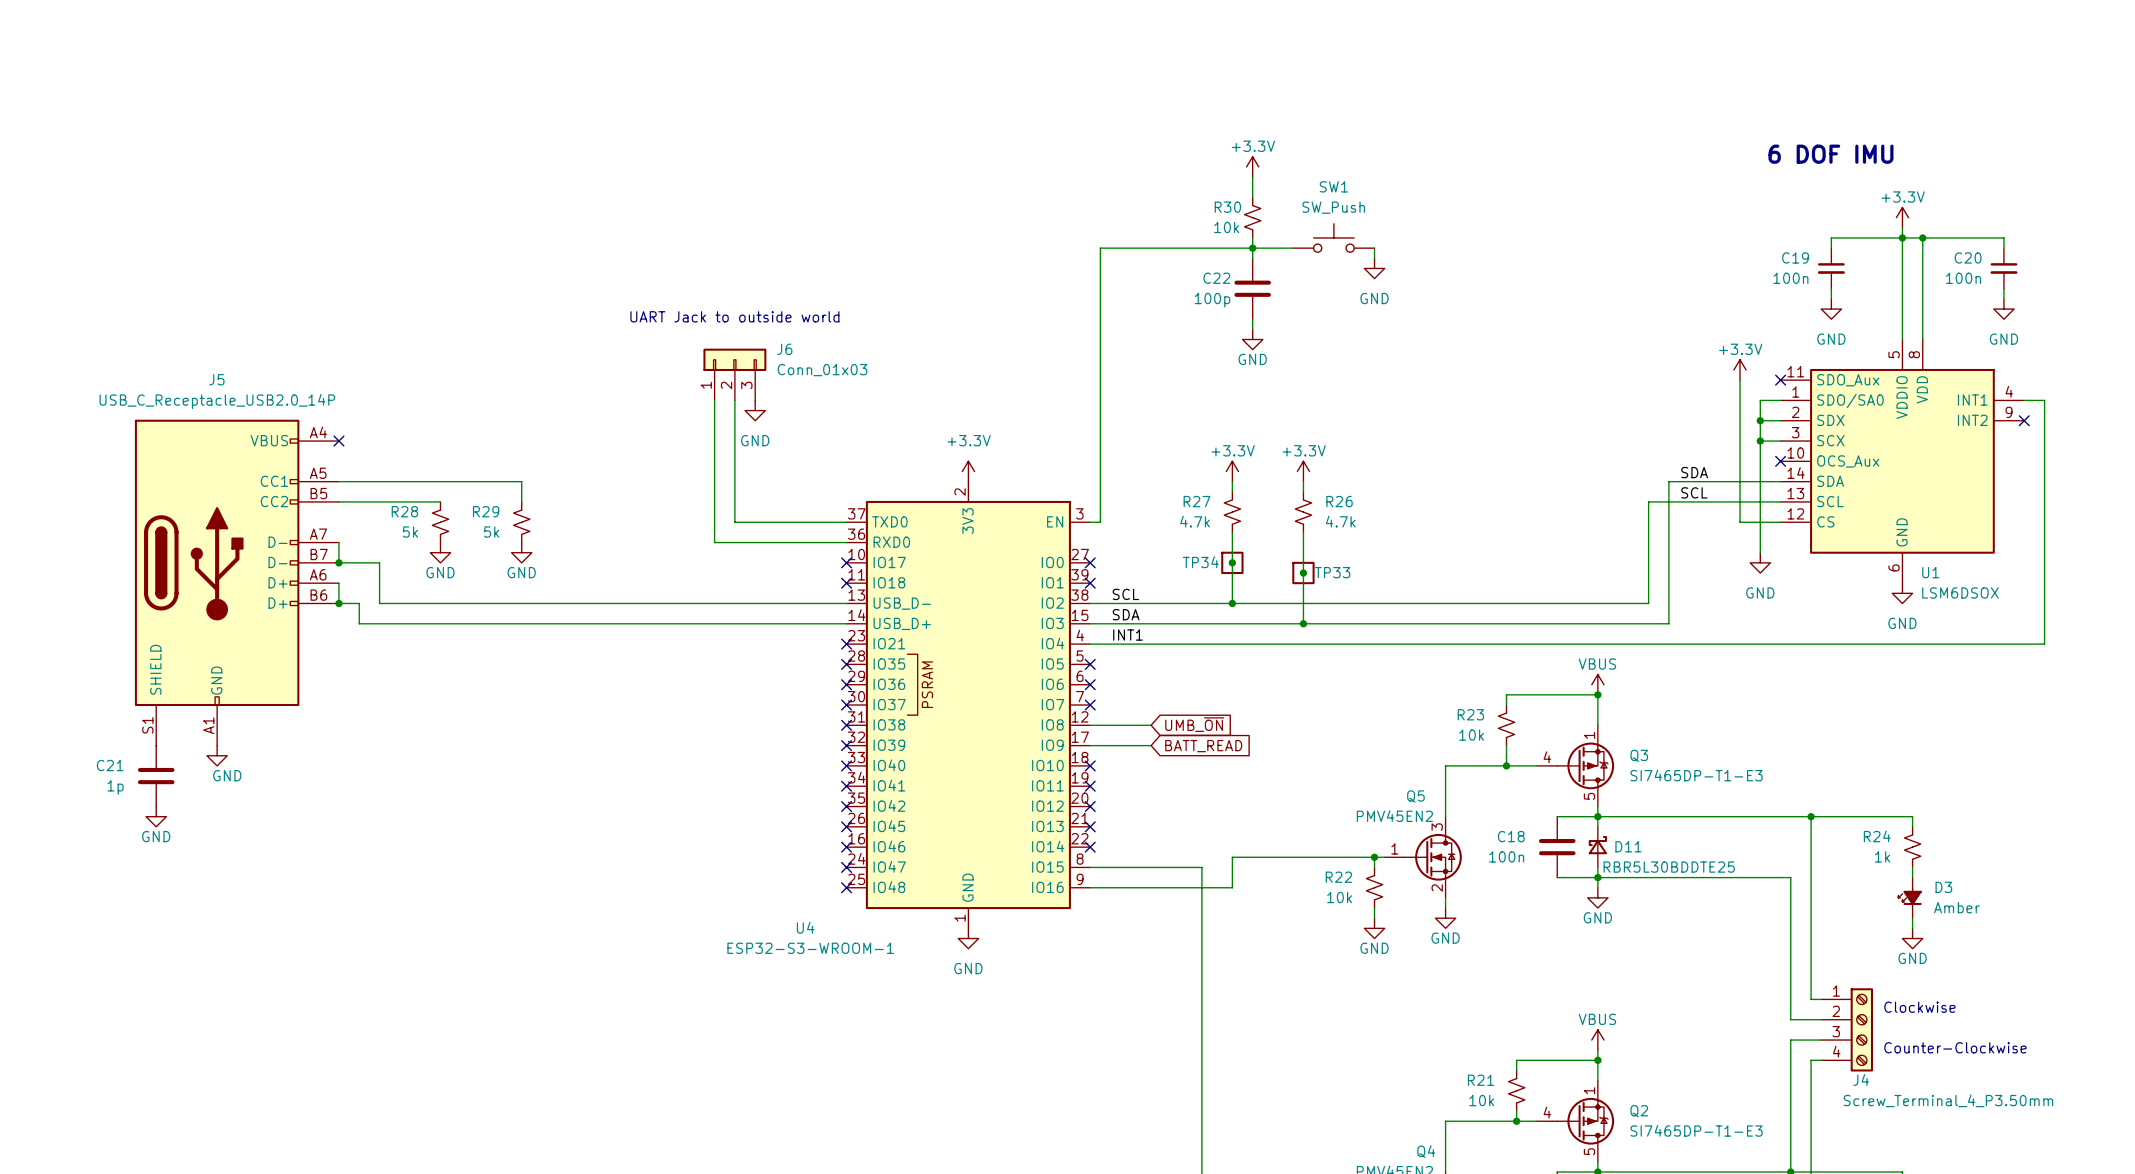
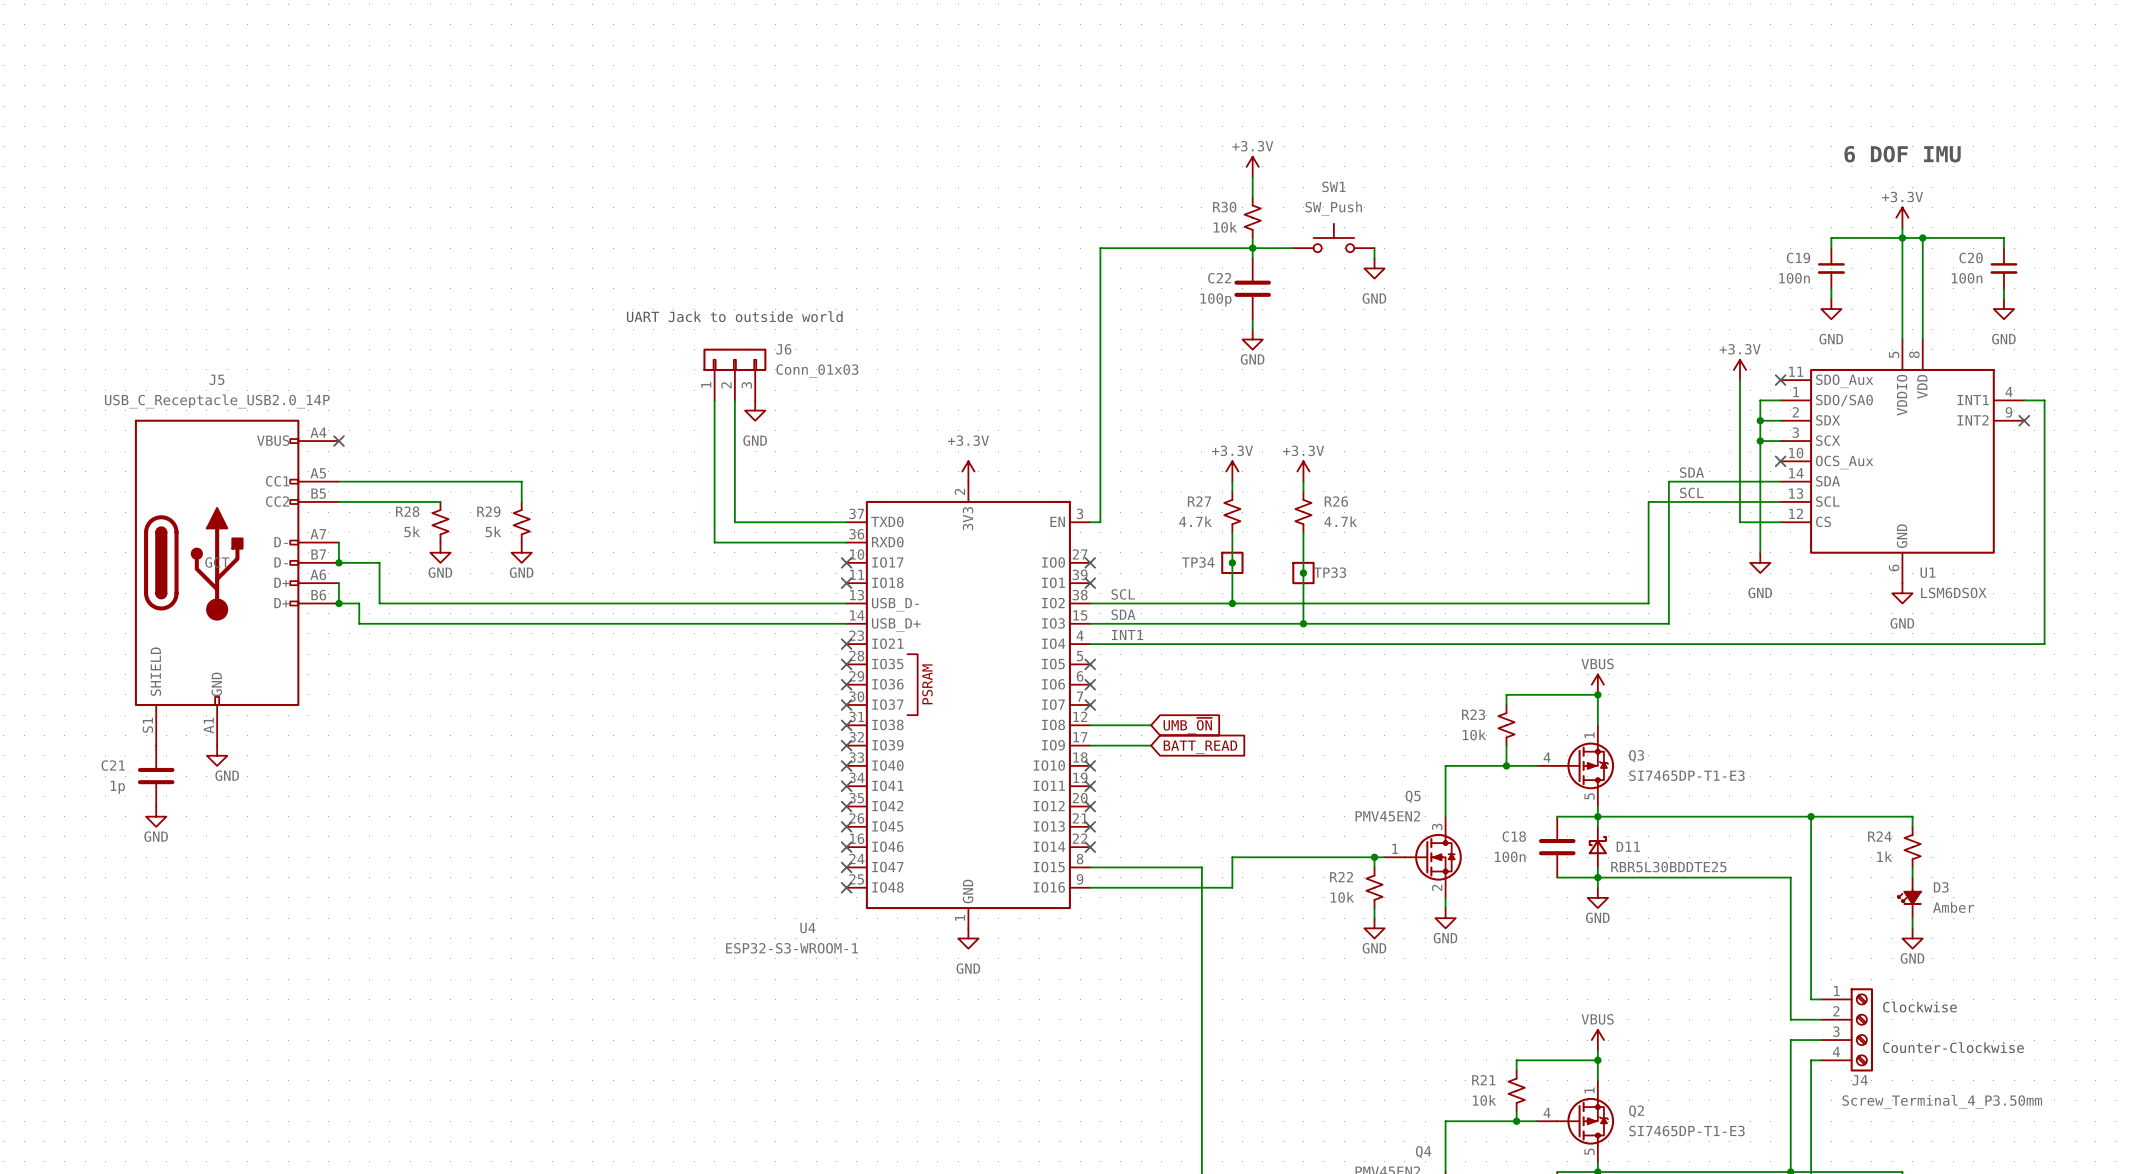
text position: 6 DOF IMU (1830, 154) -> 6 DOF IMU (1902, 154)
J5 text: none -> GCT (217, 562)

